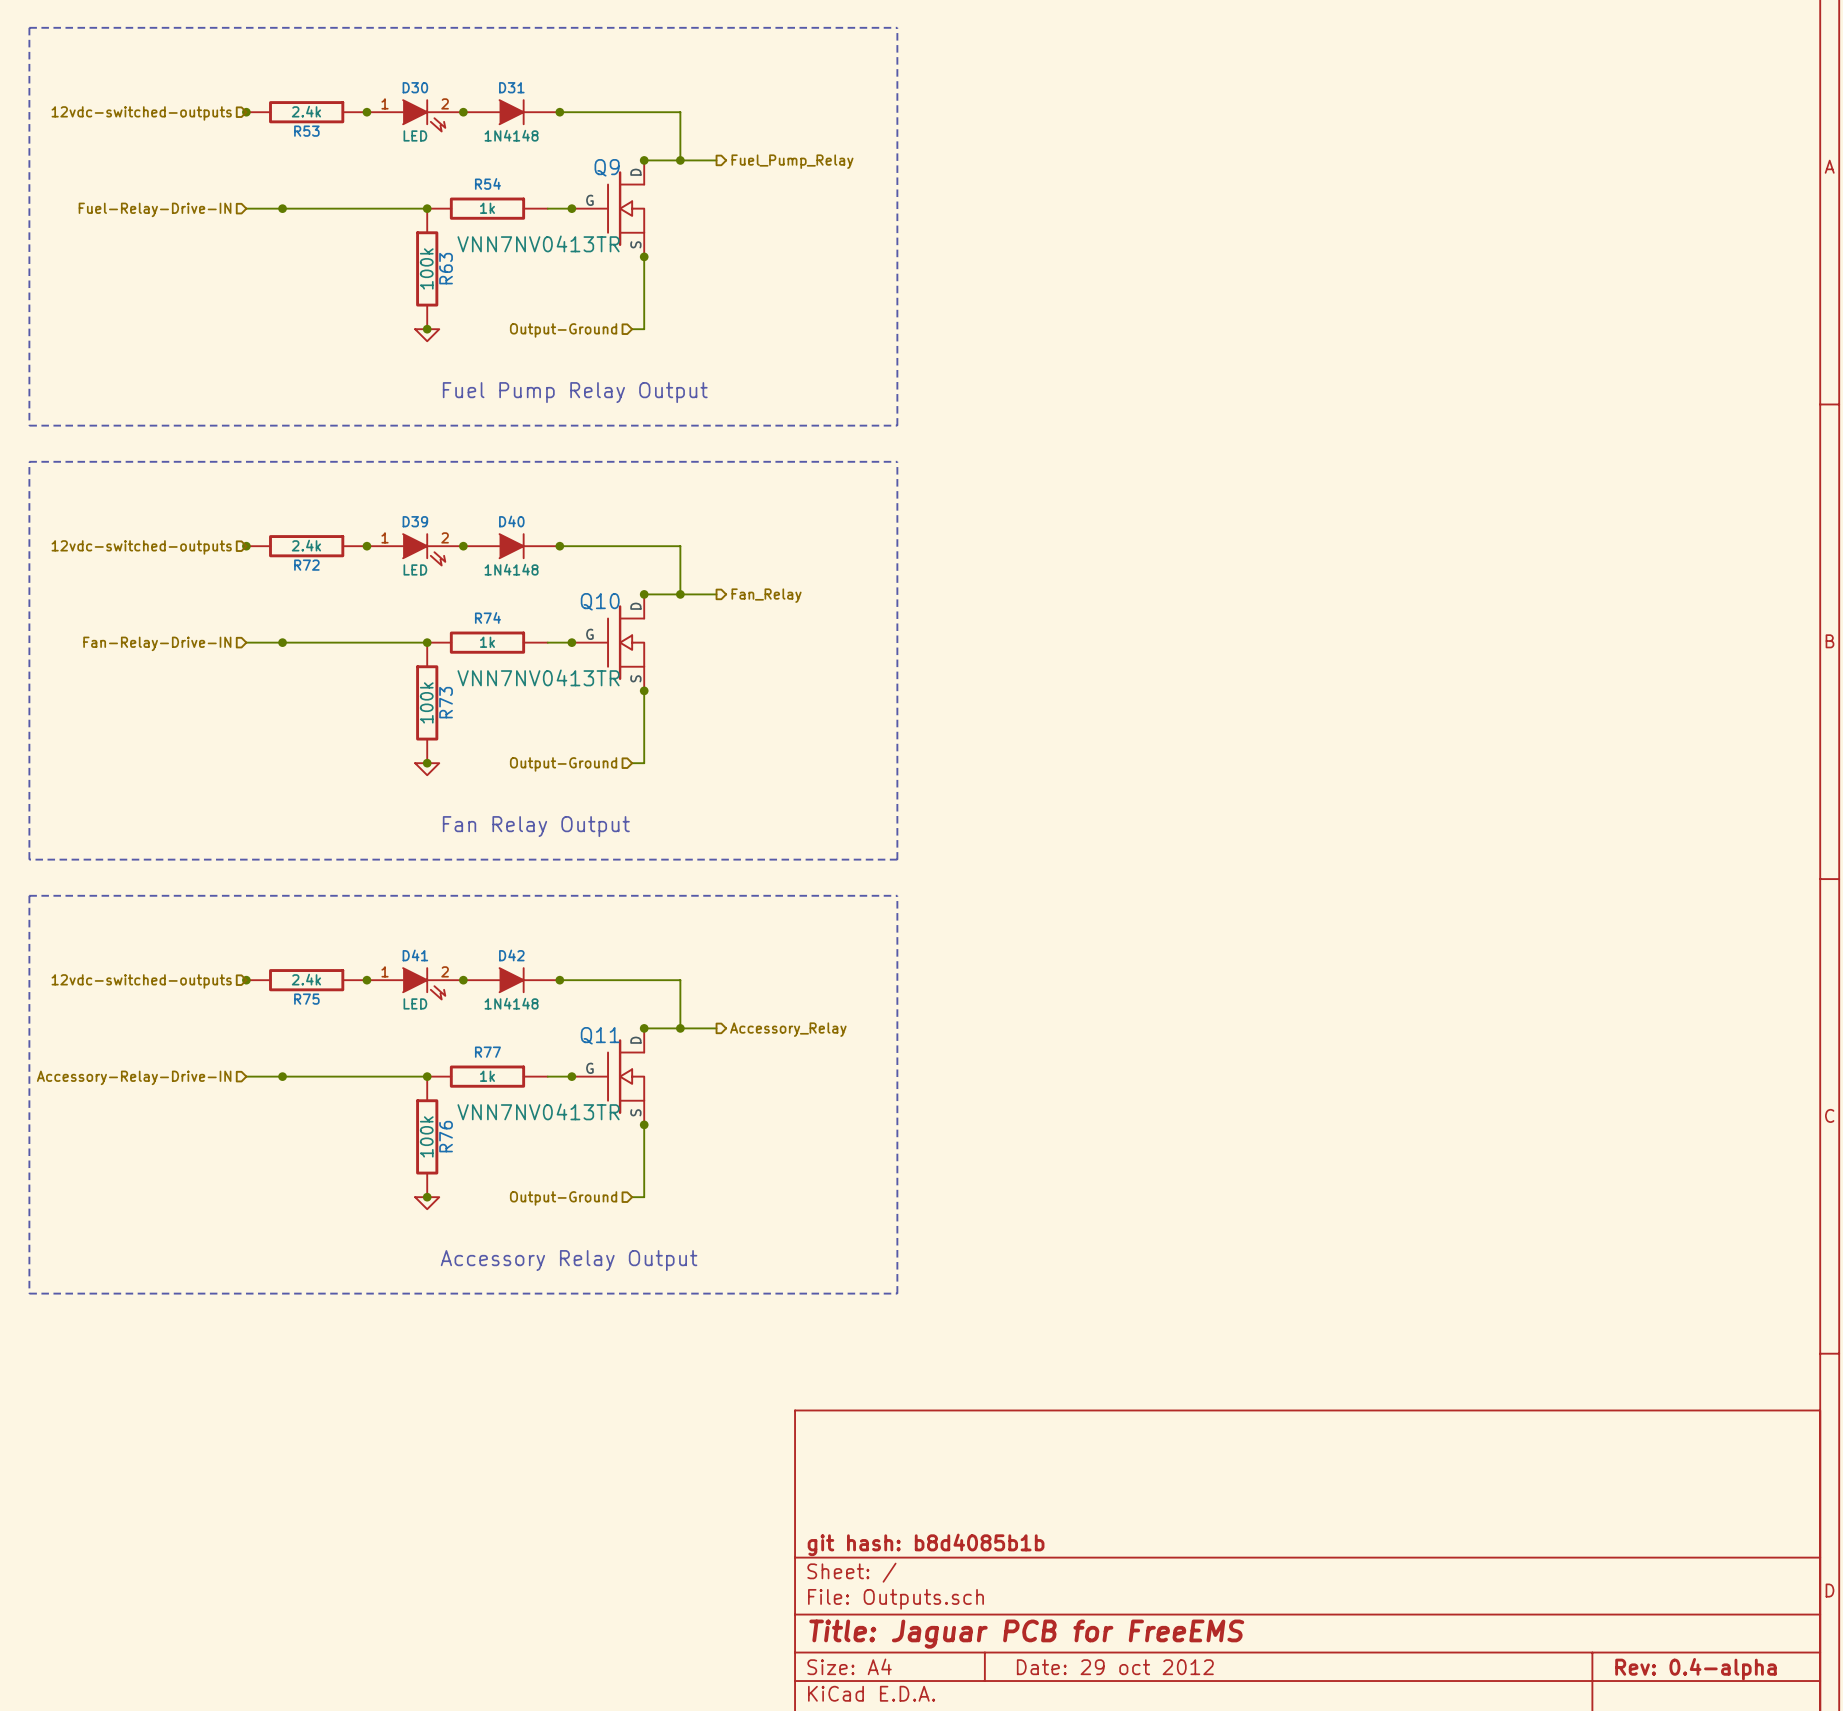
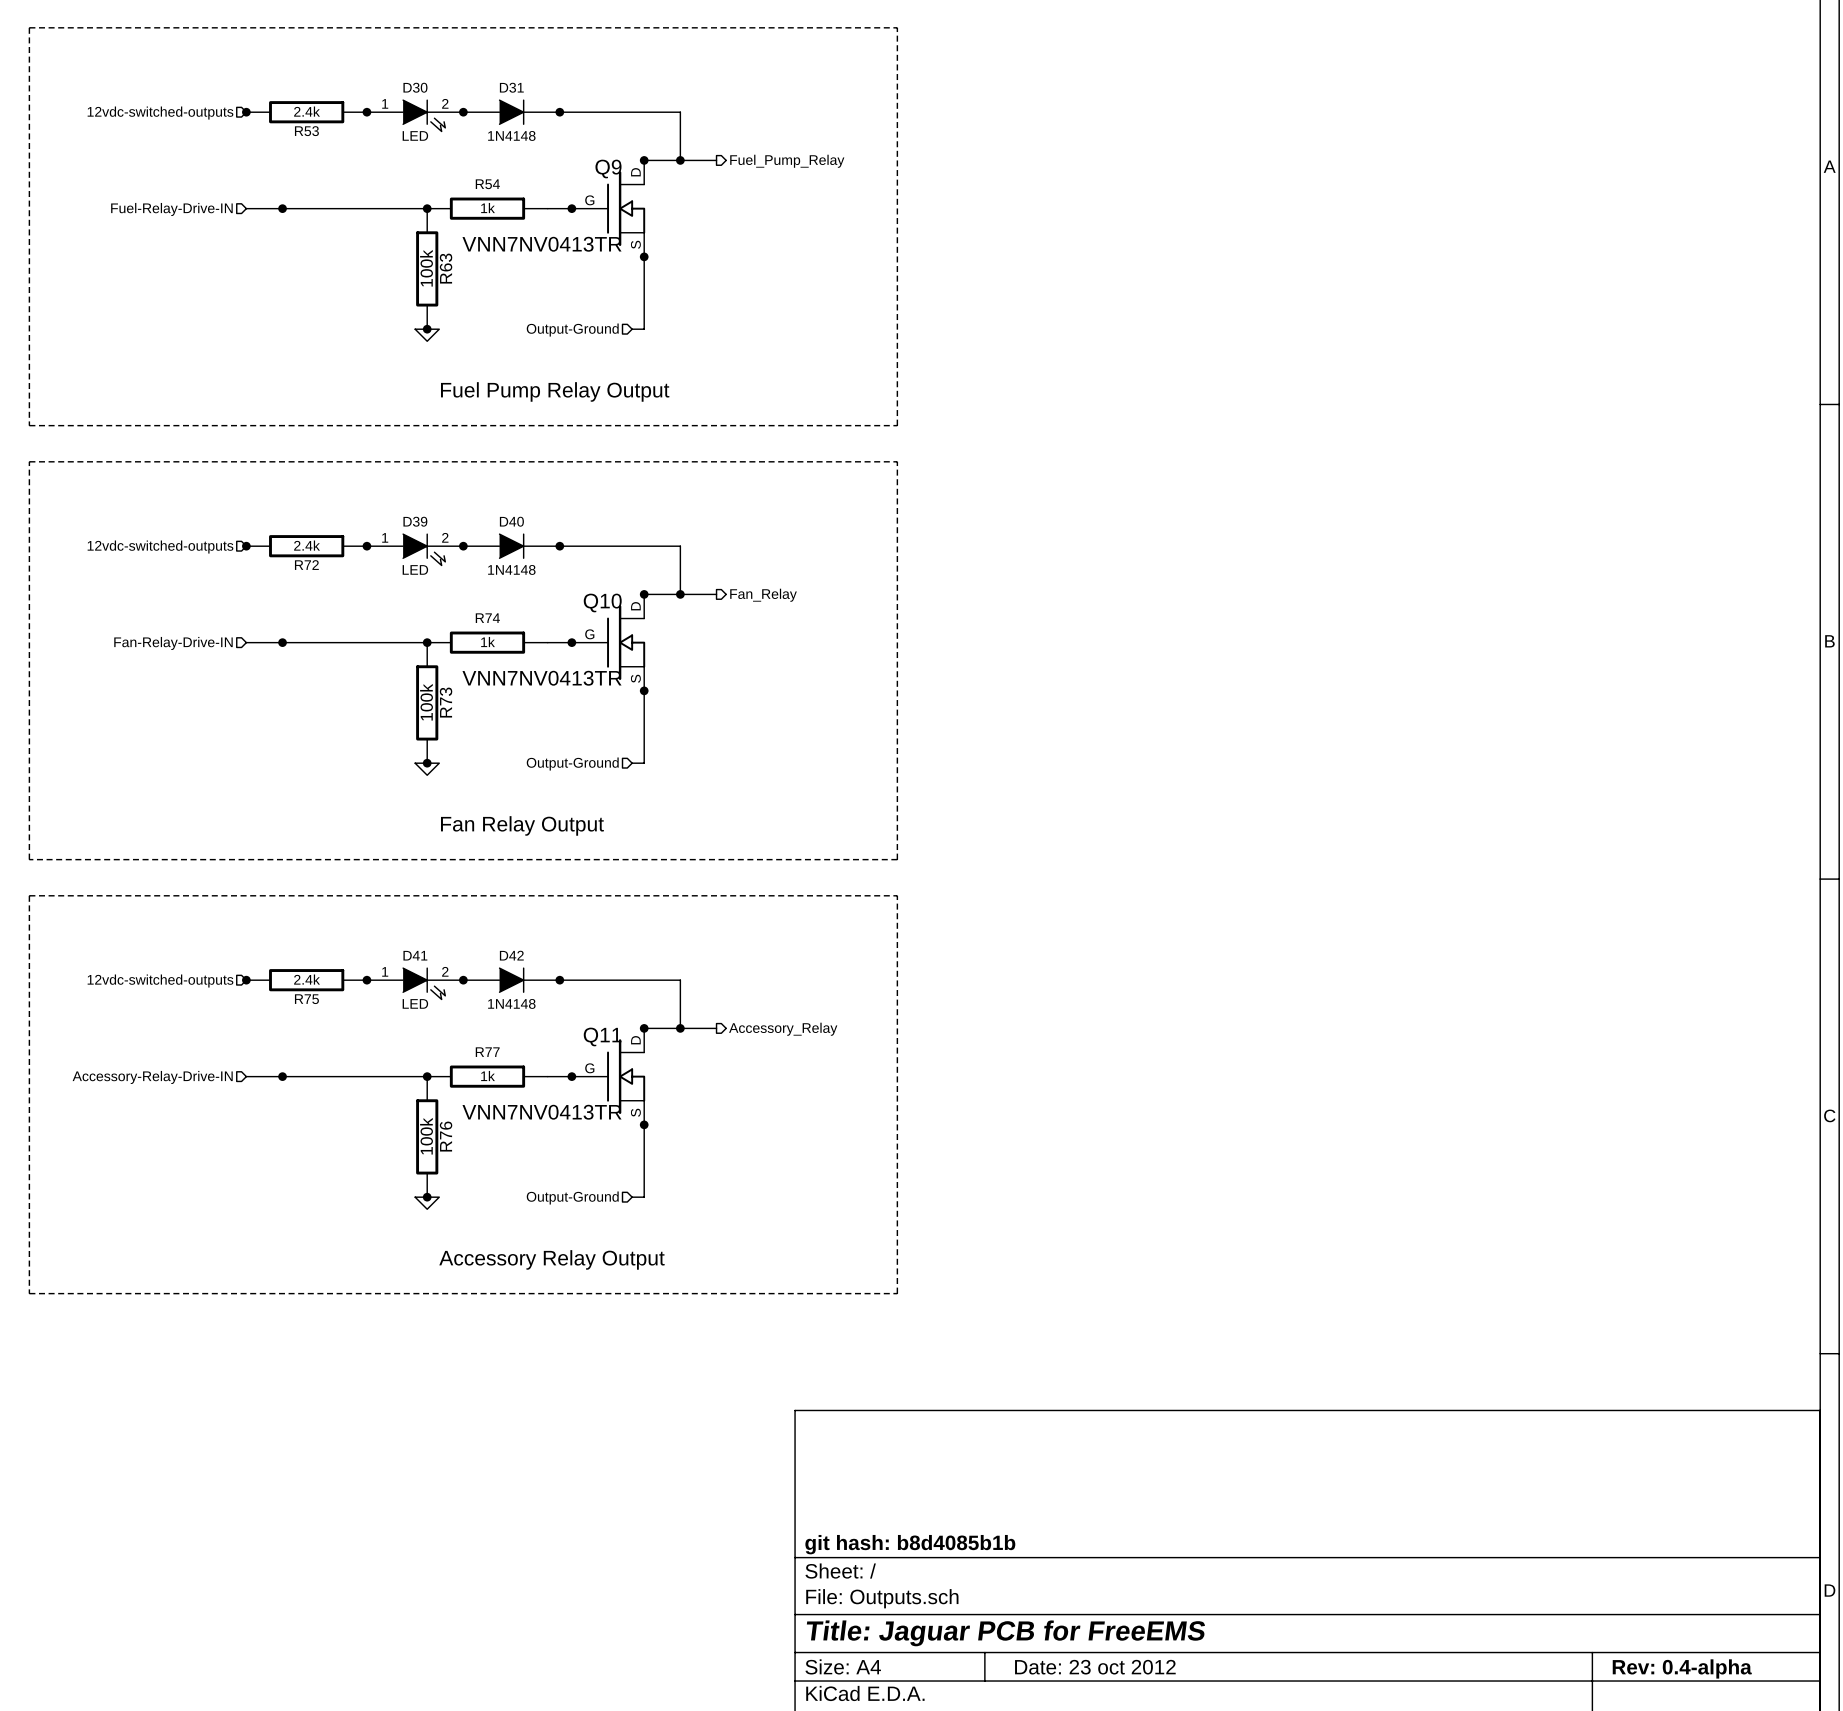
title block: Date: 29 oct 2012 (1115, 1667) -> Date: 23 oct 2012 (1095, 1667)

